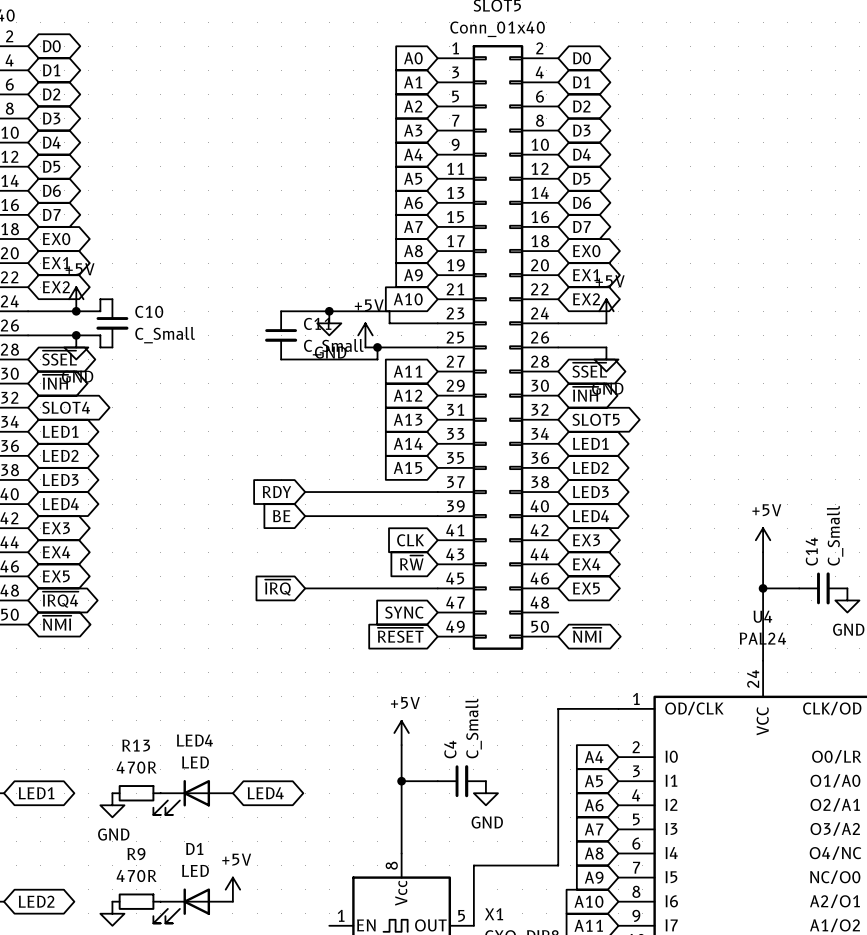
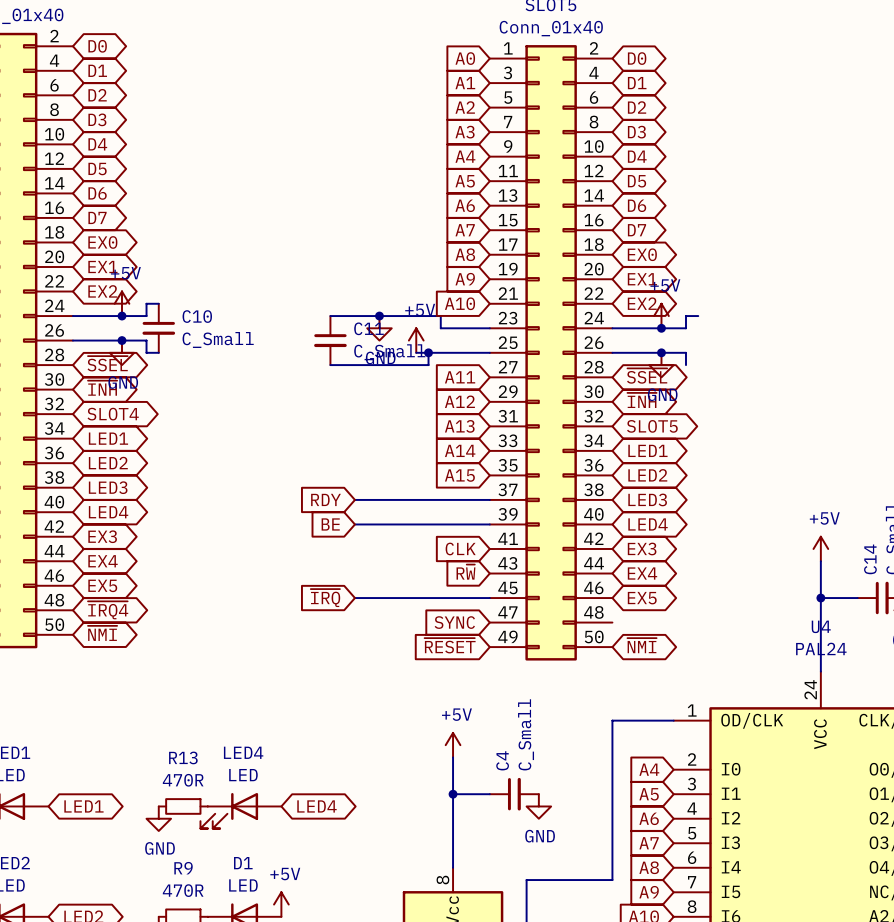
wire: none -> (698, 316) (685, 316) (685, 328) (661, 328)
junction: none -> (661, 328)
wire: none -> (661, 352) (685, 352) (685, 365)
junction: none -> (661, 352)

